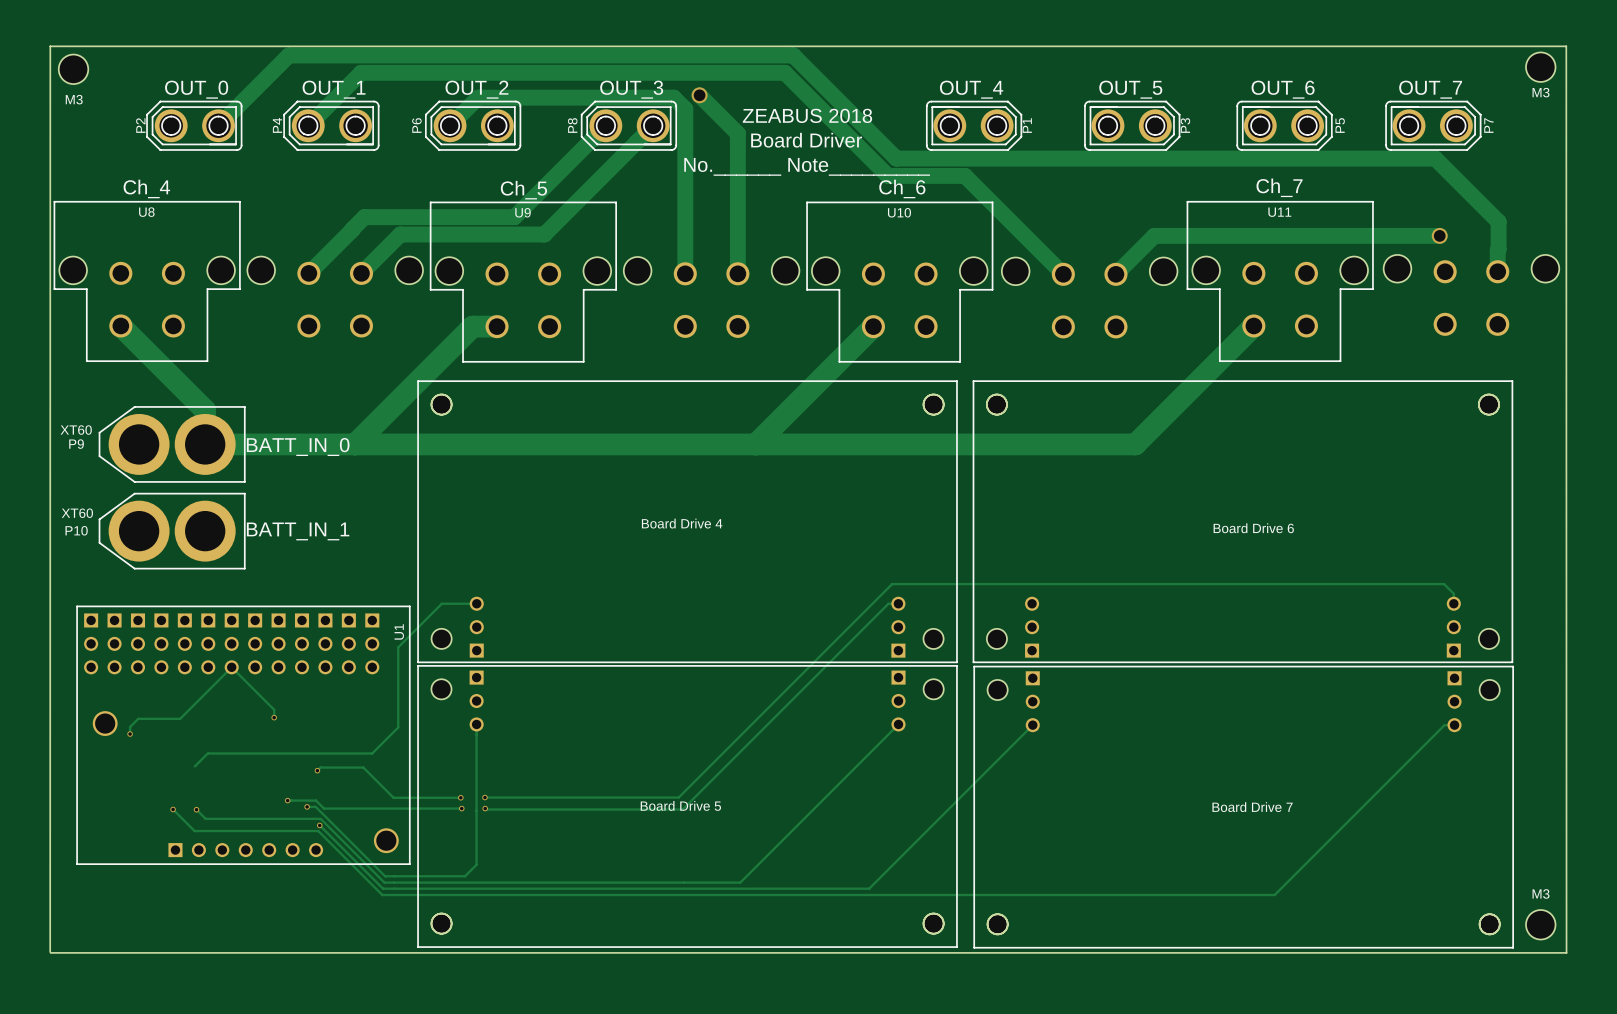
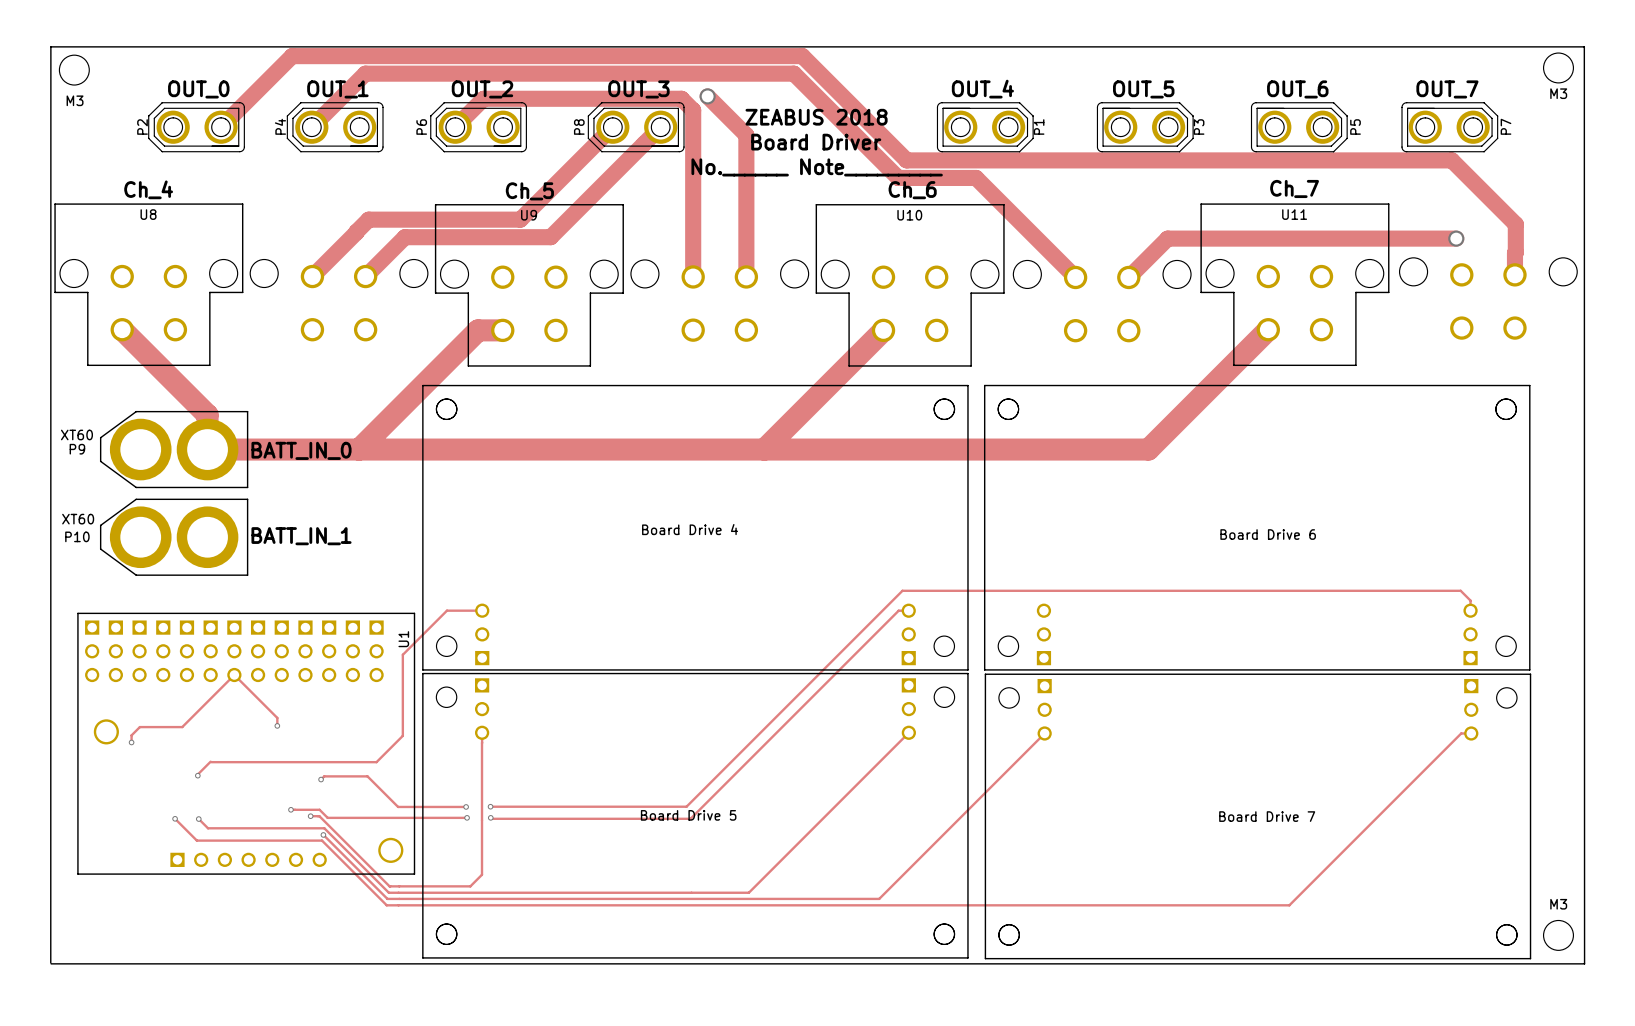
via: none -> (197, 775)

